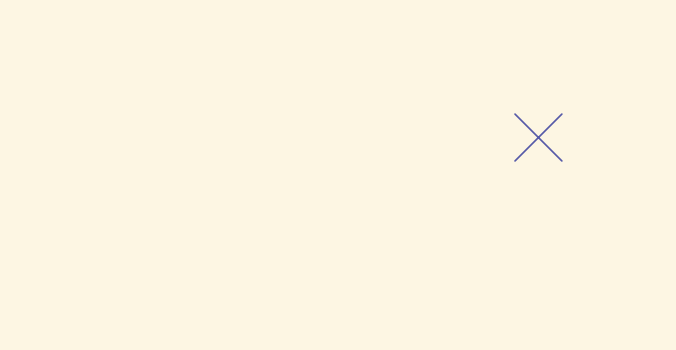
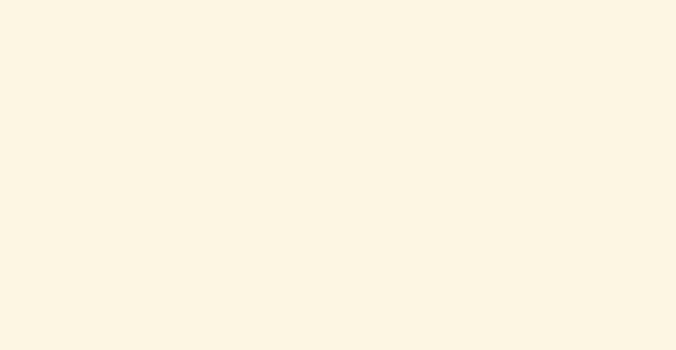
no-connect mark: (538, 137) -> none

